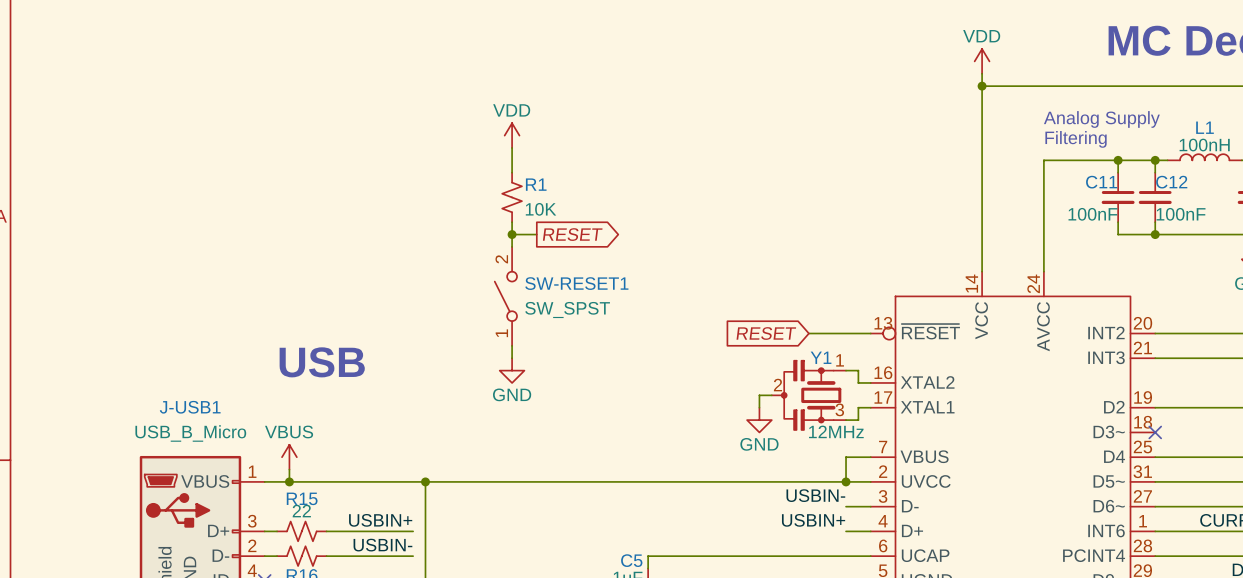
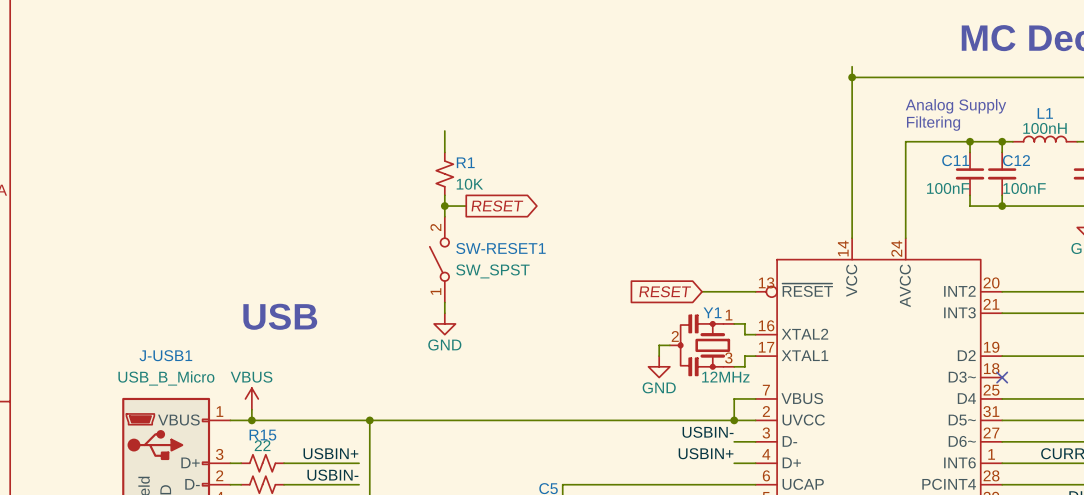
power symbol: VDD (982, 61) -> none
power symbol: VDD (512, 135) -> none

